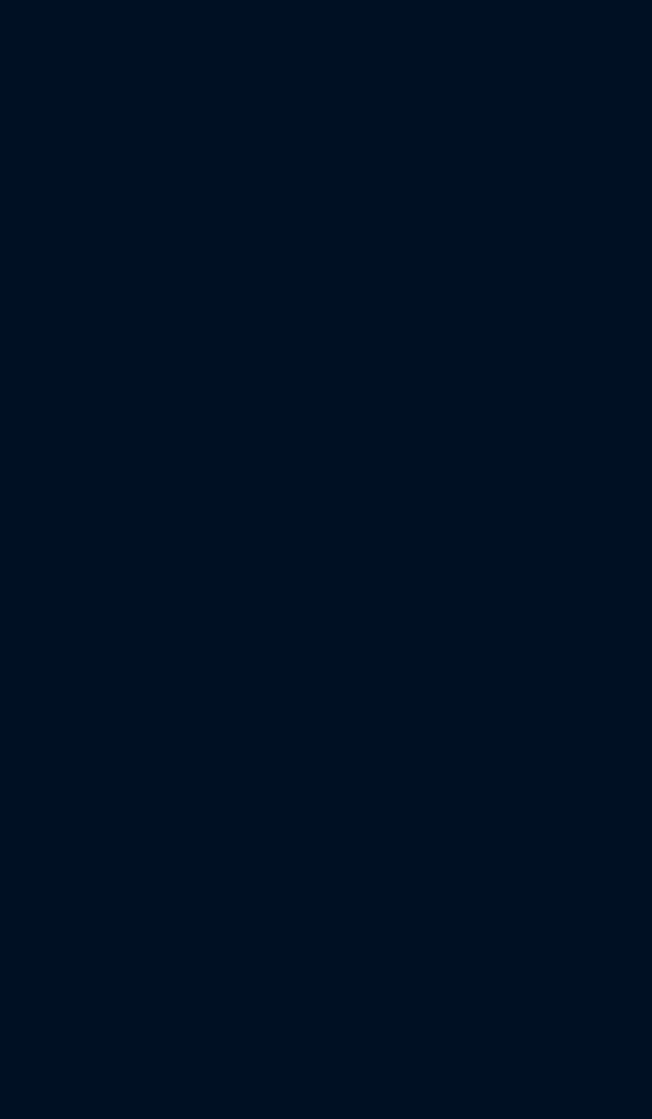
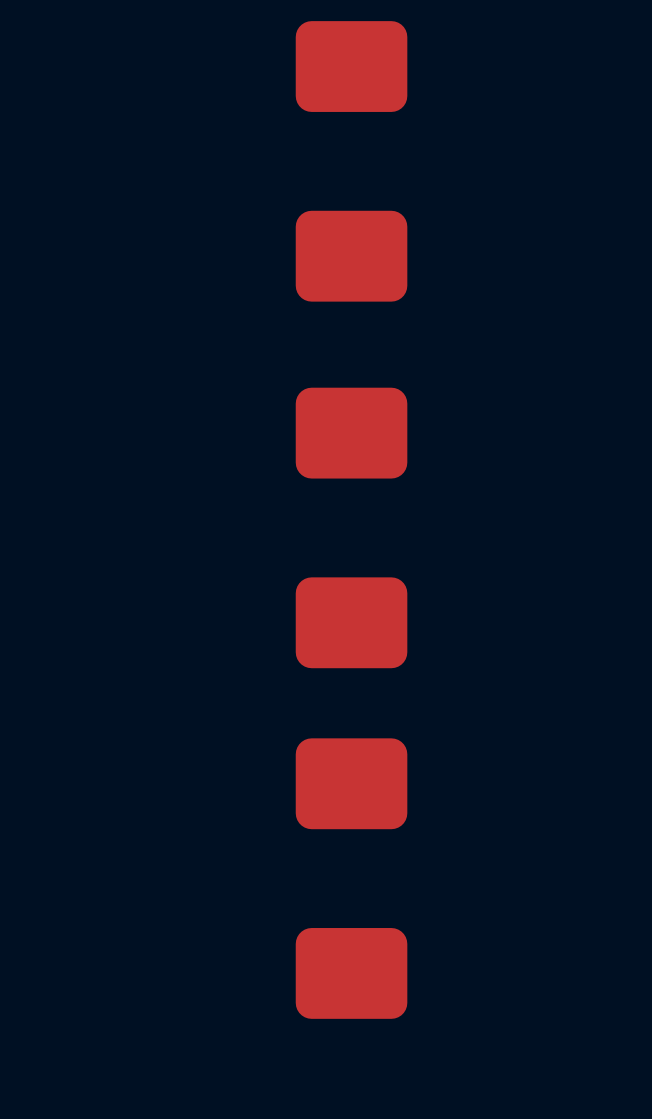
part: none -> (351, 161)
part: none -> (351, 527)
part: none -> (351, 878)

